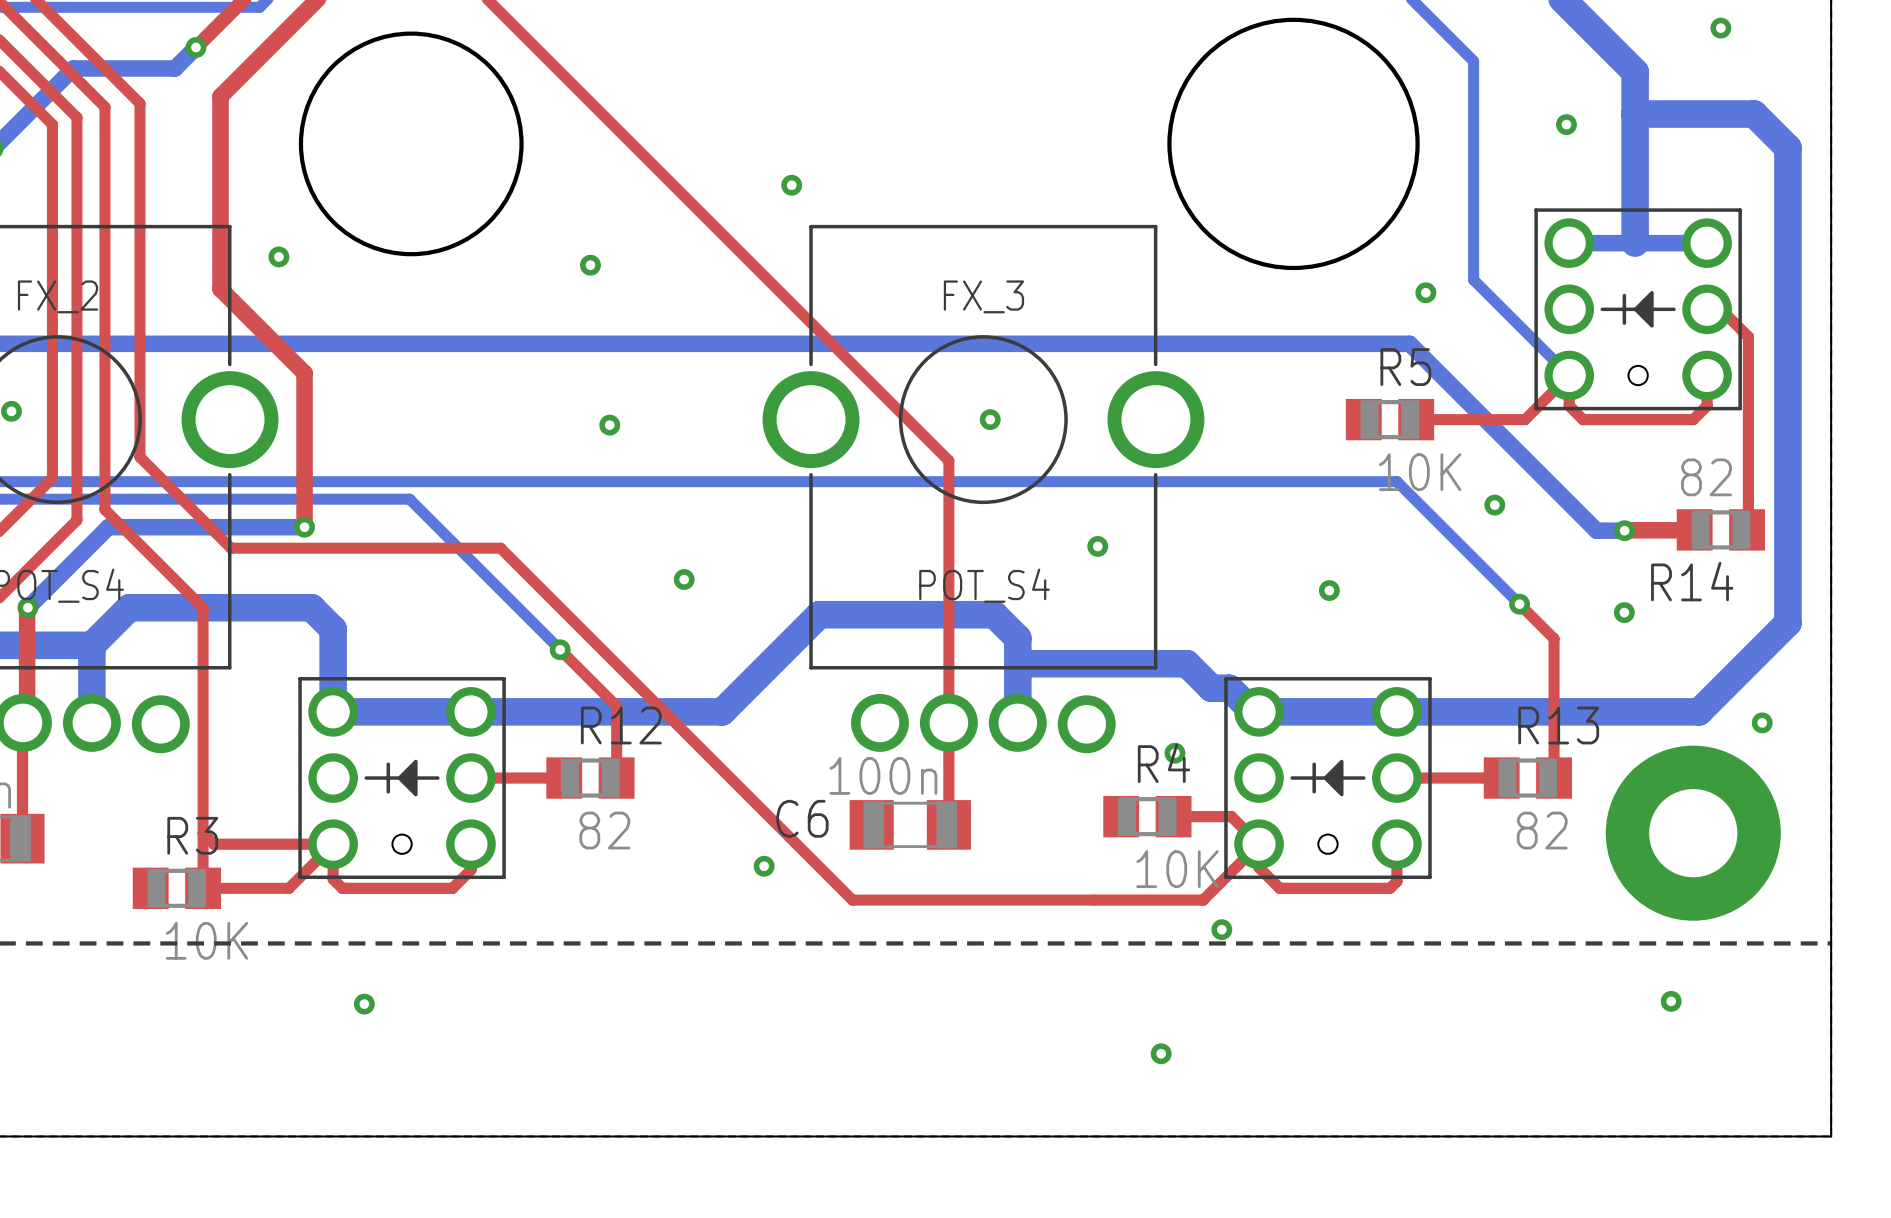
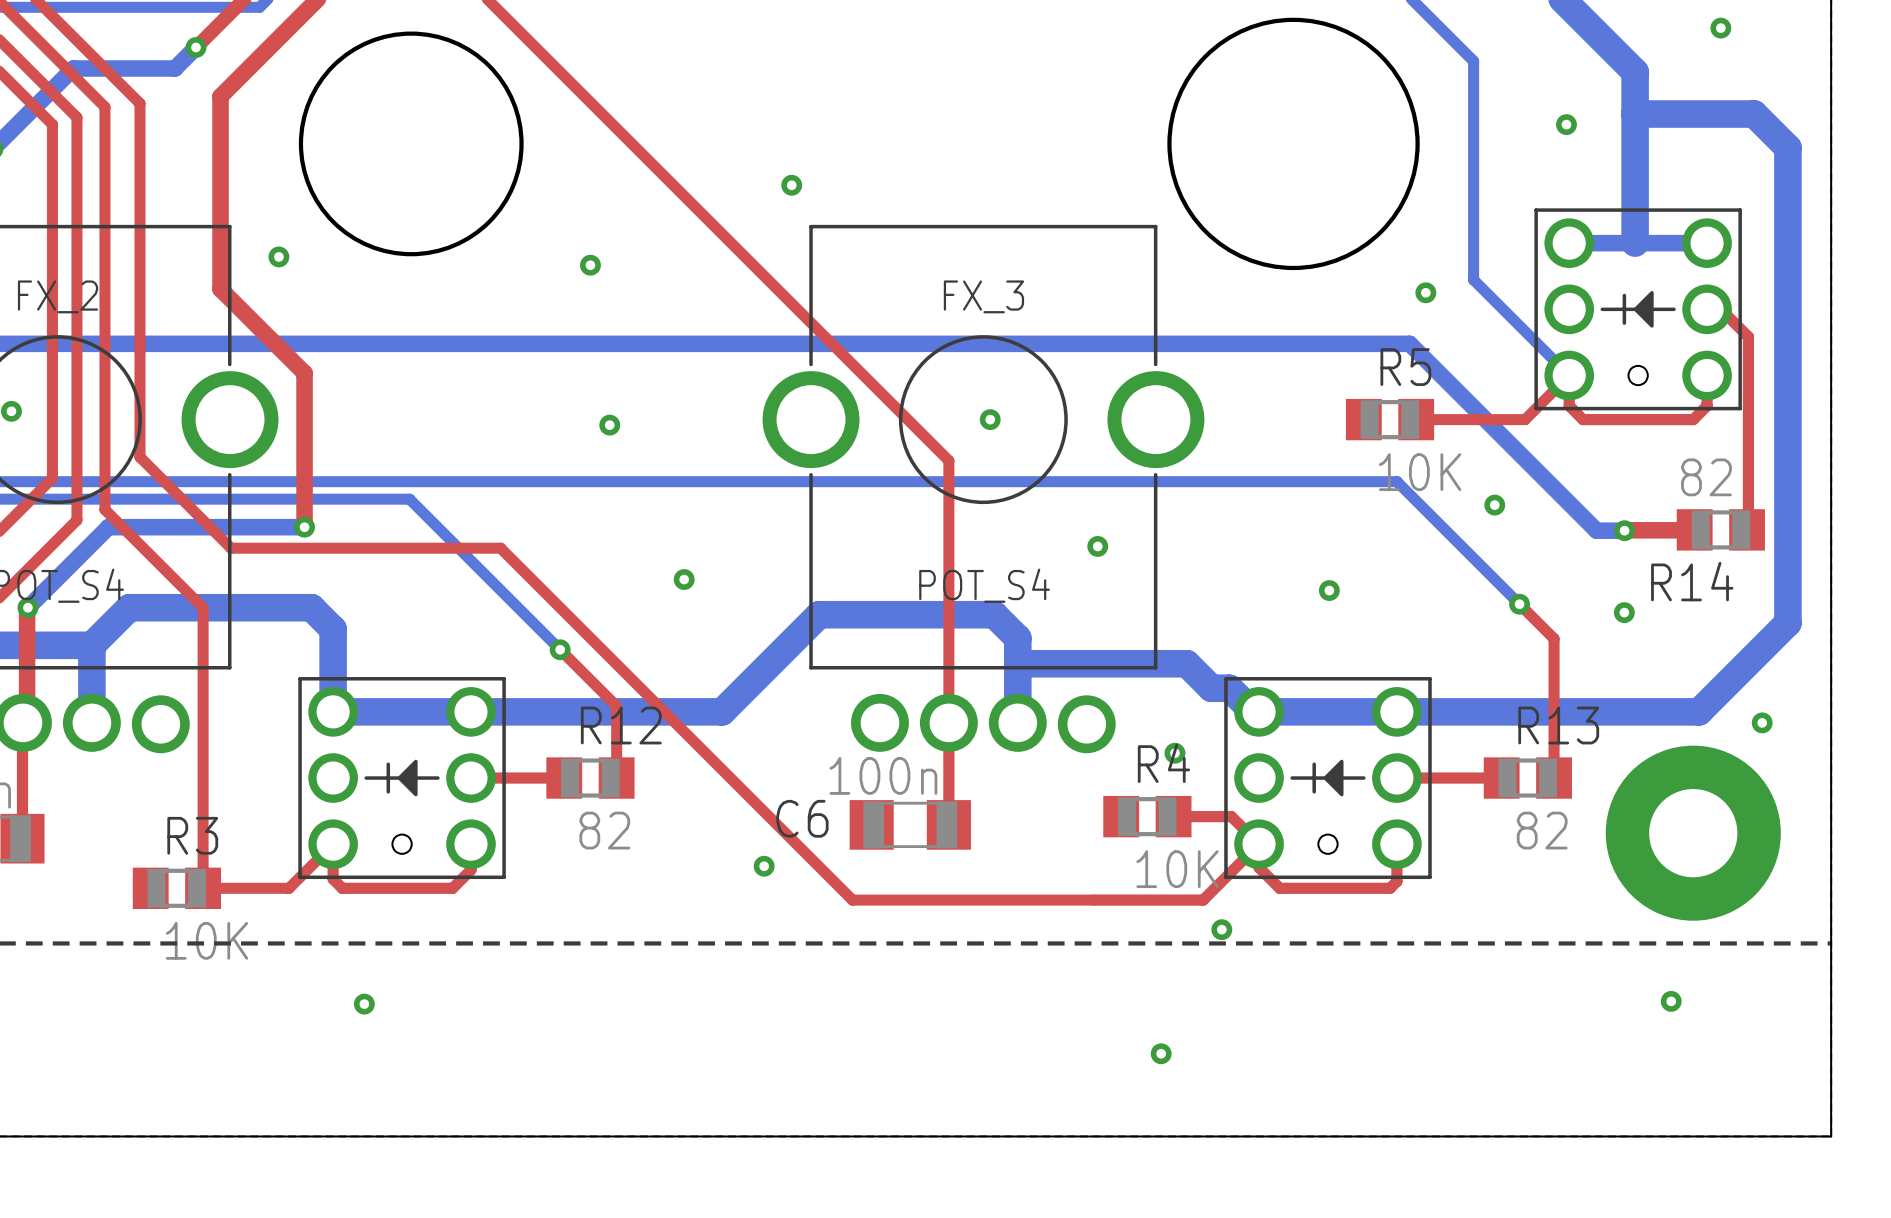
top track: (203, 833) (214, 844) (333, 844) -> none

